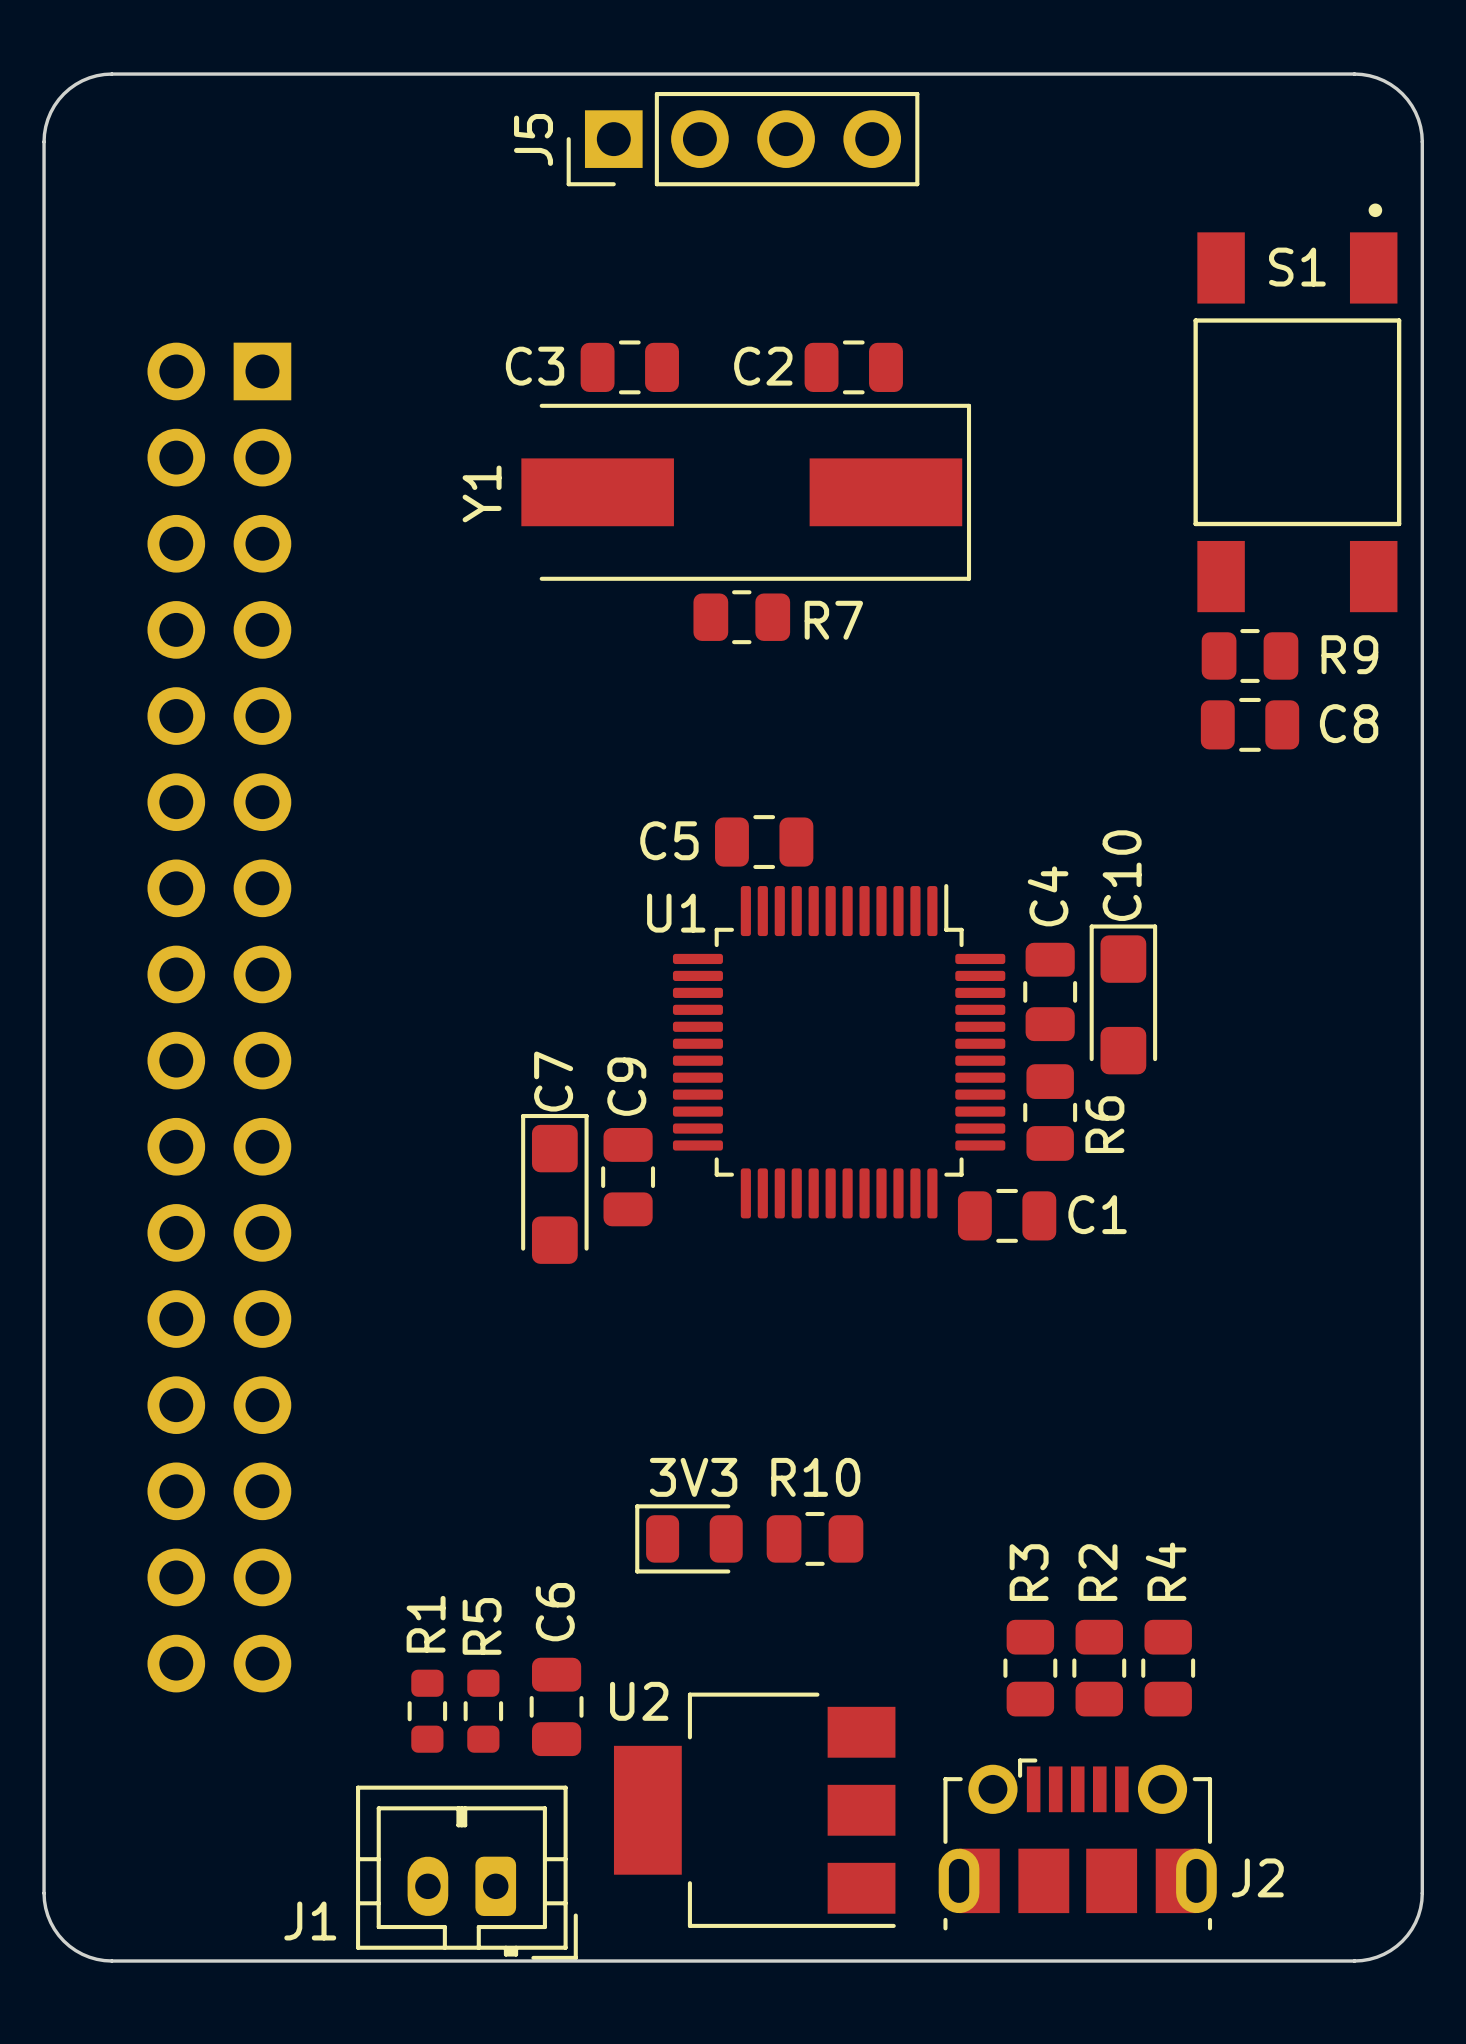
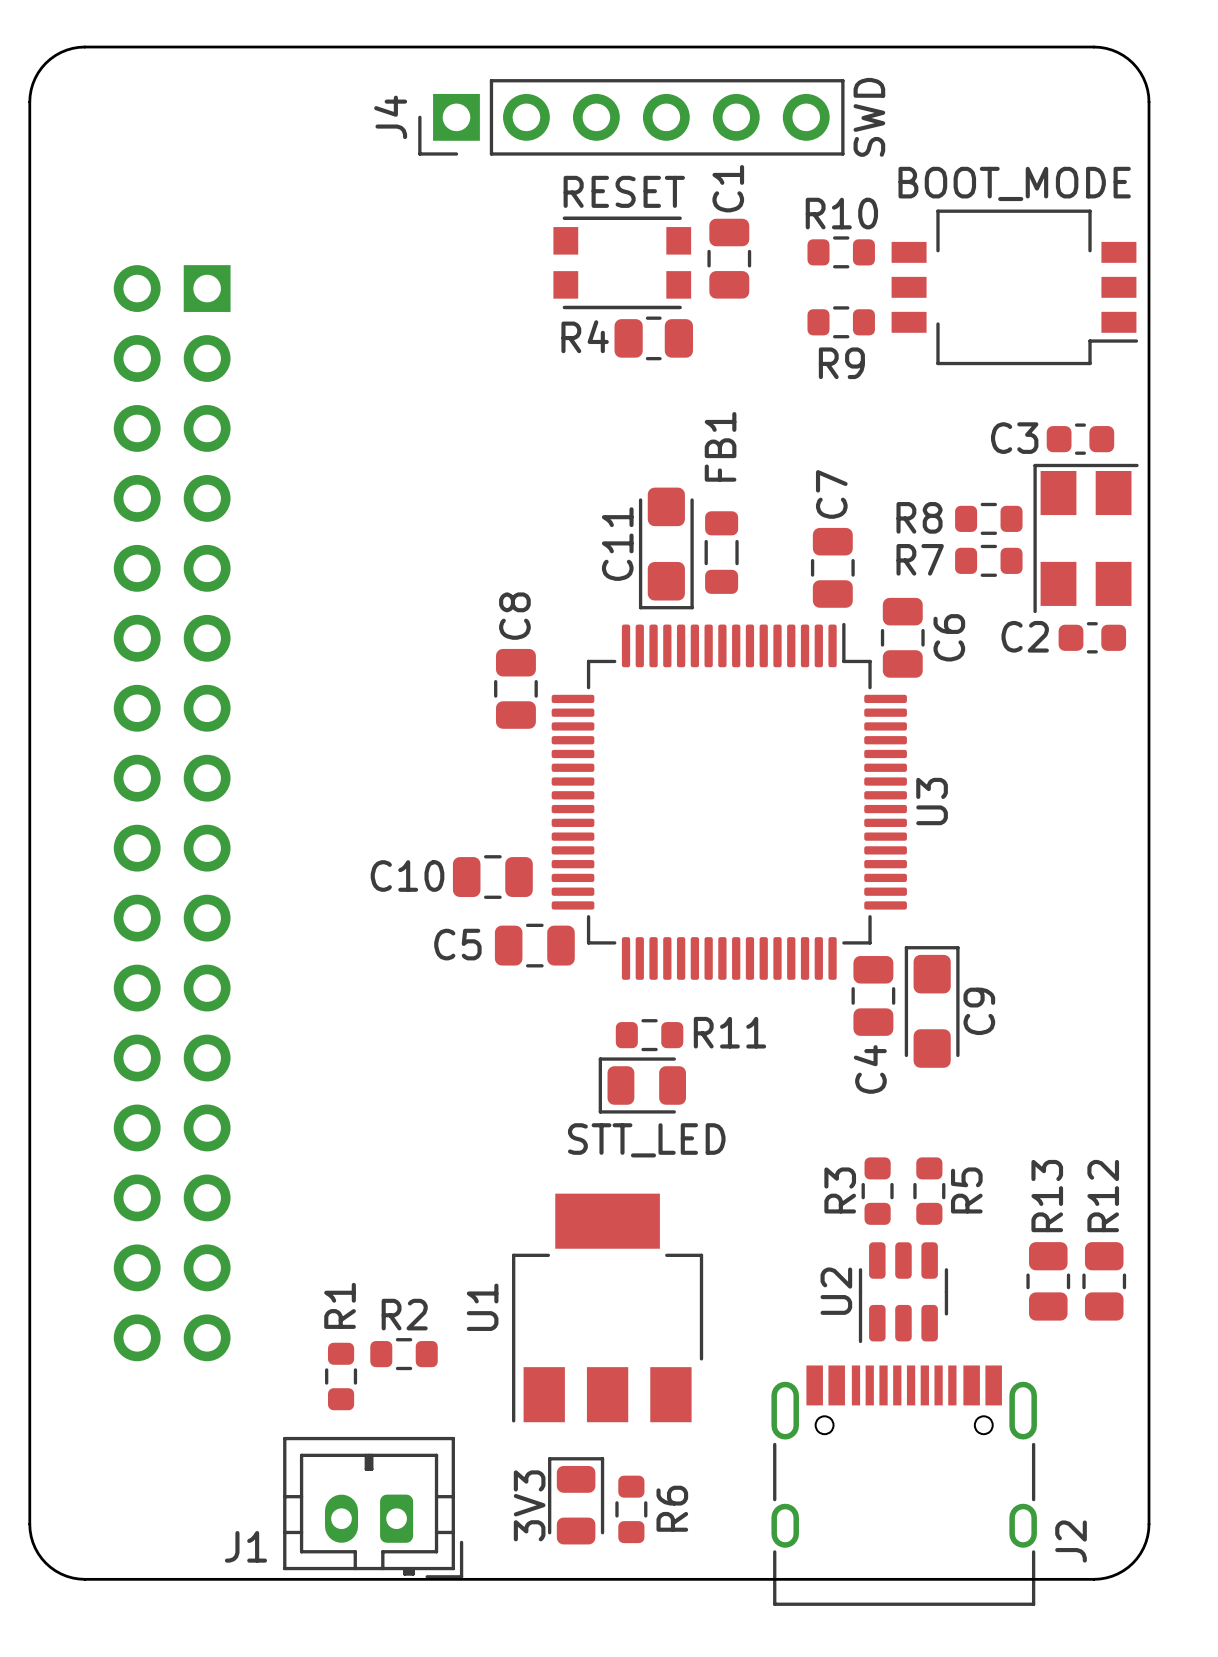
J5: (743, 139) -> none
J4: none -> SWD (631, 117)
part: none -> RESET (622, 262)
C3 footprint: [580, 340, 679, 395] -> [1046, 423, 1115, 455]
C2 footprint: [804, 340, 903, 395] -> [1058, 622, 1127, 654]
part: none -> BOOT_MODE (1014, 287)
S1: (1297, 407) -> none
Y1: (746, 492) -> none
R7 footprint: [693, 590, 791, 645] -> [955, 544, 1023, 577]
R7 name position: R7 (833, 620) -> R7 (920, 559)
R9 footprint: [1201, 629, 1299, 683] -> [807, 306, 875, 339]
R9 name position: R9 (1349, 654) -> R9 (841, 363)
R8: none -> (988, 518)
part: none -> (1086, 538)
C11: none -> (666, 548)
FB1: none -> (721, 552)
C8 name position: C8 (1349, 723) -> C8 (514, 616)
C8 rotation: 0° (1250, 724) -> 90° clockwise (515, 688)
C8 position: (1250, 724) -> (515, 688)
C5 position: (764, 842) -> (534, 945)
C10 name position: C10 (1122, 875) -> C10 (407, 876)
U1 footprint: [672, 884, 1006, 1219] -> [512, 1193, 704, 1423]
C4 name position: C4 (1048, 896) -> C4 (870, 1069)
U1 name position: U1 (676, 913) -> U1 (482, 1307)
C10 footprint: [1089, 924, 1158, 1075] -> [452, 855, 533, 899]
C4 position: (1050, 991) -> (873, 995)
U3: none -> (729, 801)
R6 footprint: [1023, 1064, 1078, 1161] -> [615, 1475, 648, 1544]
C9 name position: C9 (626, 1086) -> C9 (979, 1011)
C7 footprint: [521, 1113, 589, 1264] -> [810, 527, 855, 608]
C9 footprint: [601, 1127, 656, 1227] -> [904, 946, 960, 1068]
C1 name position: C1 (1097, 1214) -> C1 (728, 188)
C1 rotation: 0° (1007, 1215) -> 90° clockwise (729, 258)
C1 position: (1007, 1215) -> (729, 258)
R11: none -> (649, 1035)
part: none -> STT_LED (642, 1085)
part value position: 3V3 (693, 1477) -> 3V3 (529, 1505)
R10 footprint: [766, 1511, 864, 1566] -> [807, 236, 875, 269]
part rotation: 0° (688, 1538) -> 90° clockwise (576, 1500)
part position: (688, 1538) -> (576, 1500)
R4 name position: R4 (1166, 1571) -> R4 (585, 336)
R3 name position: R3 (1029, 1572) -> R3 (840, 1190)
R13: none -> (1048, 1281)
R12: none -> (1104, 1281)
C6 name position: C6 (555, 1612) -> C6 (949, 637)
R3 footprint: [1003, 1619, 1058, 1717] -> [861, 1157, 894, 1225]
R2 footprint: [1072, 1619, 1127, 1717] -> [370, 1338, 438, 1371]
R5 name position: R5 (482, 1626) -> R5 (966, 1190)
R4 rotation: 0° (1168, 1668) -> 90° clockwise (653, 338)
R4 position: (1168, 1668) -> (653, 338)
U2 footprint: [613, 1692, 896, 1928] -> [858, 1242, 949, 1344]
U2 name position: U2 (639, 1701) -> U2 (836, 1291)
C6 position: (556, 1706) -> (902, 637)
R5 position: (483, 1711) -> (929, 1191)
J2 footprint: [938, 1758, 1217, 1931] -> [771, 1365, 1037, 1606]

